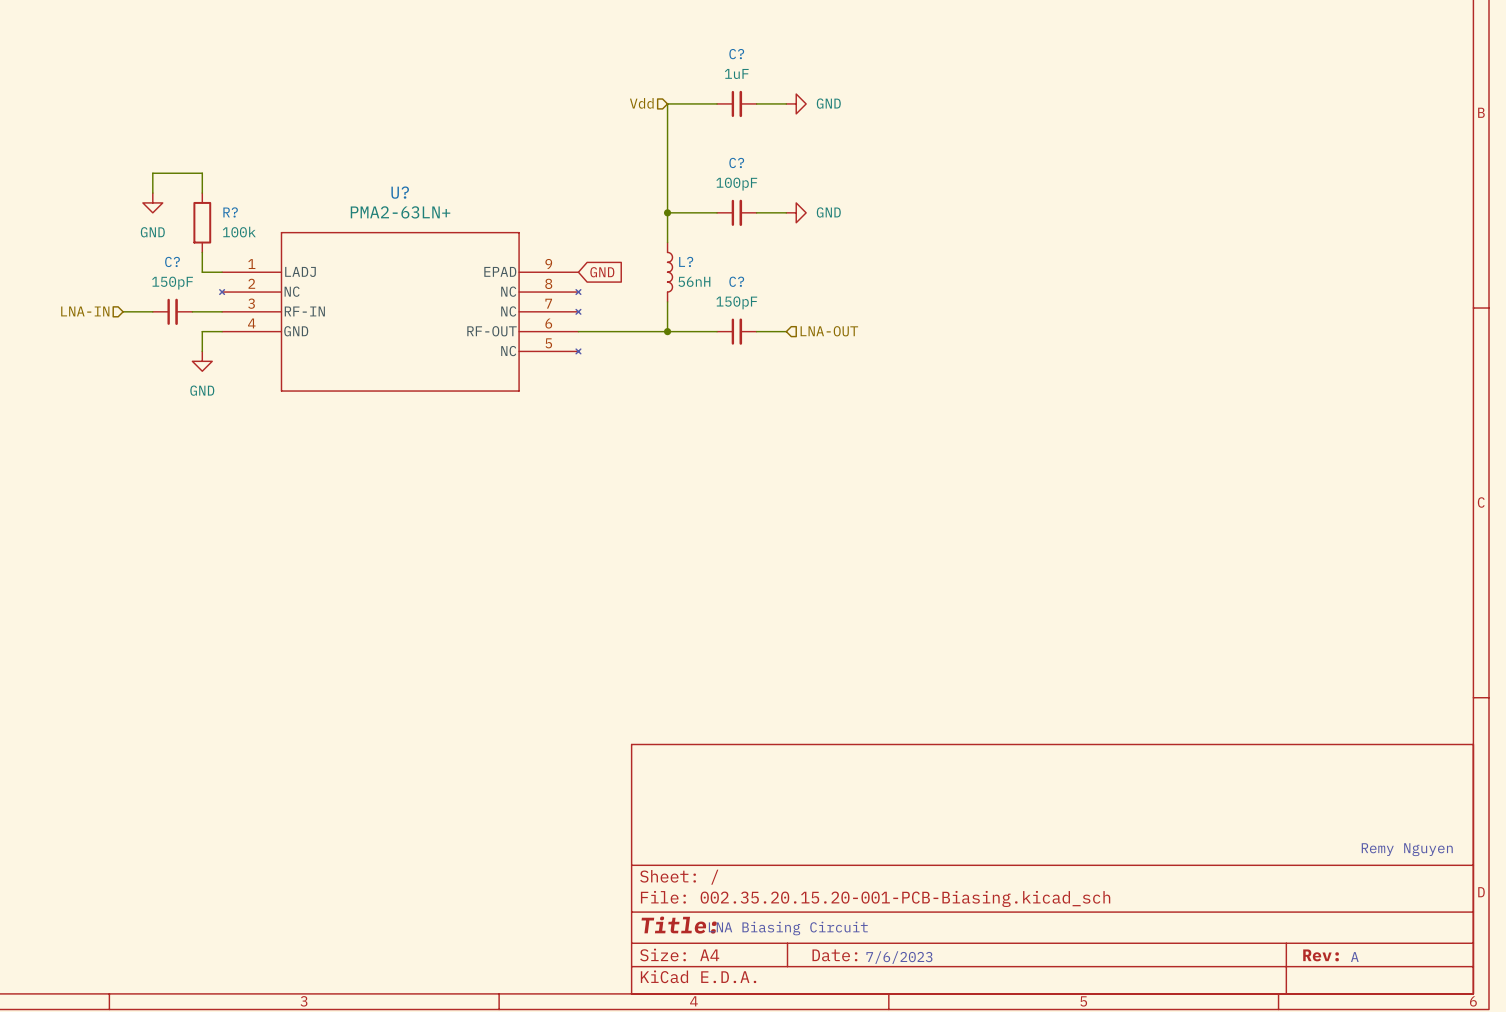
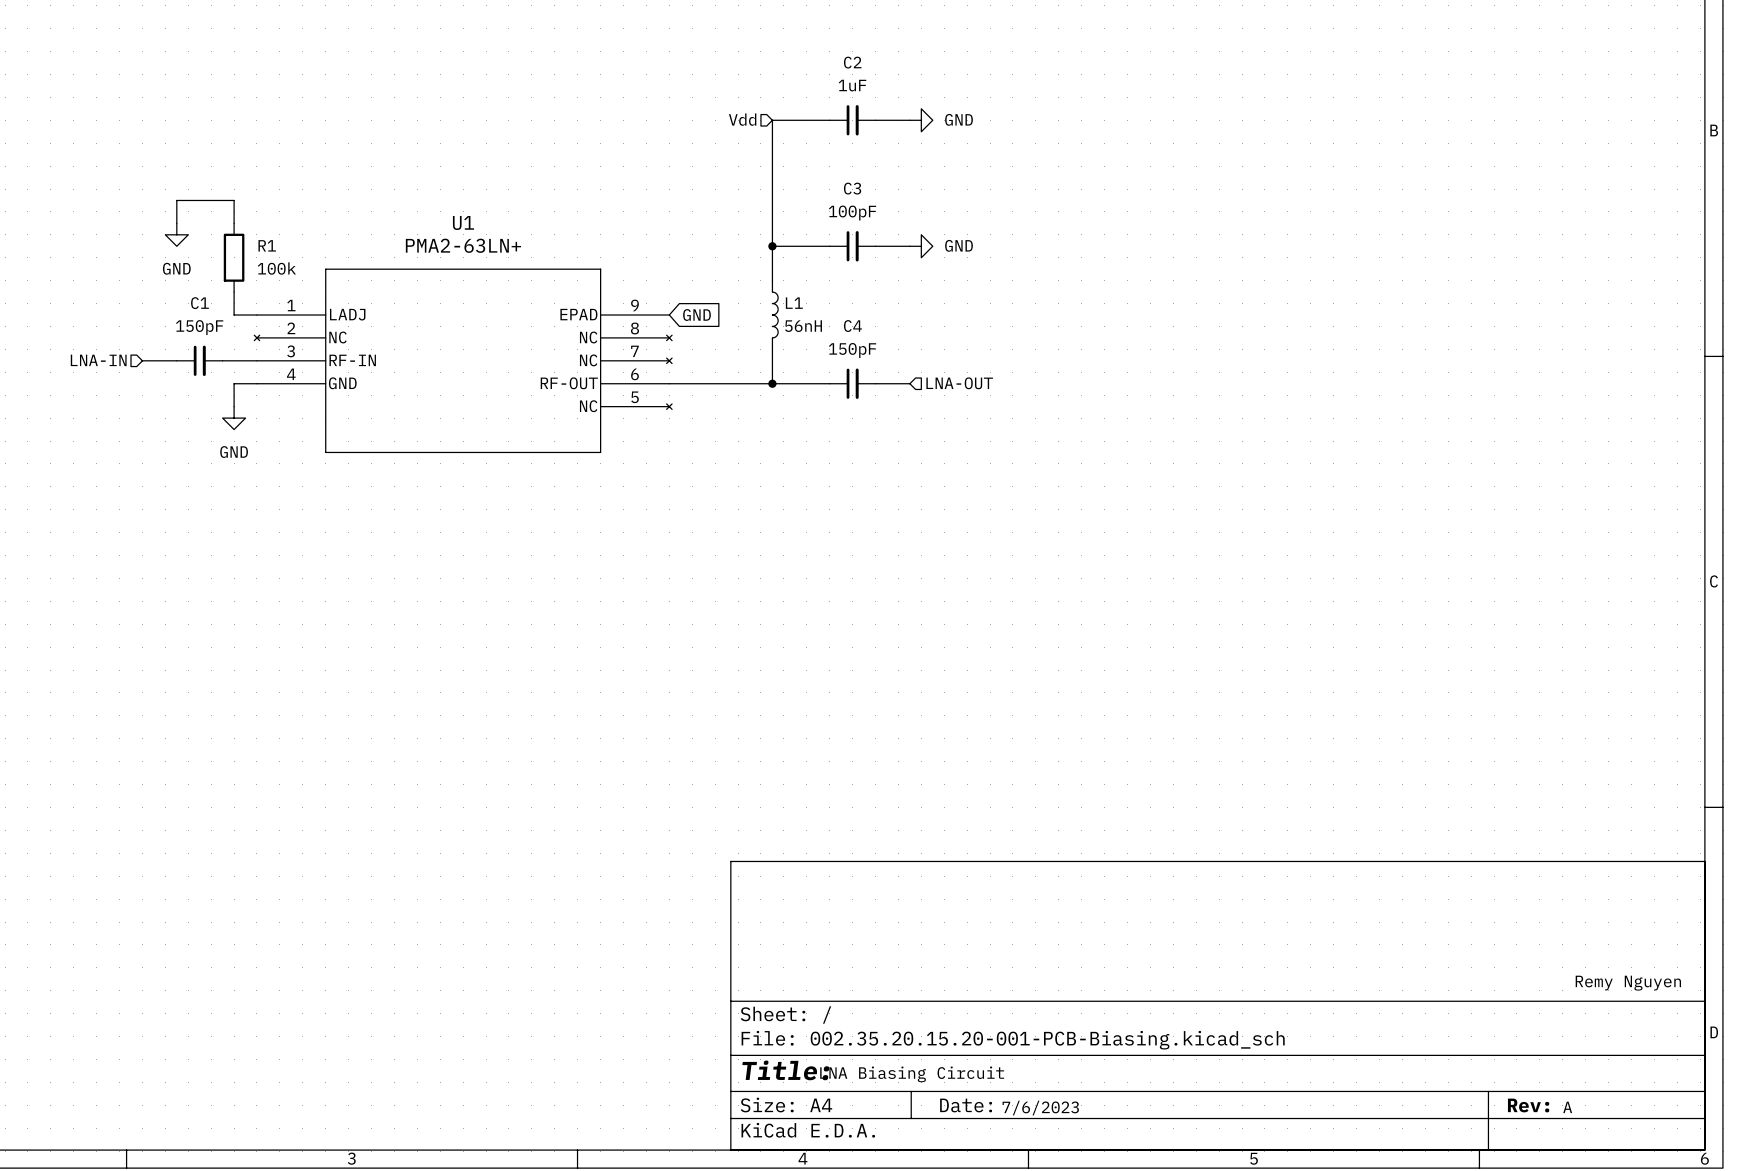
C? name: C? (736, 54) -> C2 (852, 62)
C? name: C? (736, 162) -> C3 (852, 188)
U? name: U? (400, 192) -> U1 (463, 222)
R? name: R? (230, 212) -> R1 (267, 245)
C? name: C? (172, 261) -> C1 (199, 303)
L? name: L? (686, 261) -> L1 (794, 303)
C? name: C? (736, 281) -> C4 (852, 326)

